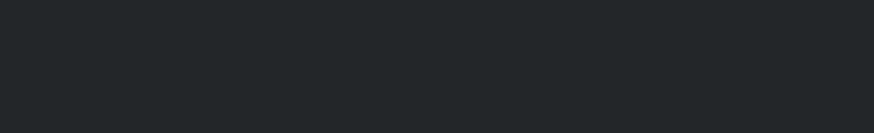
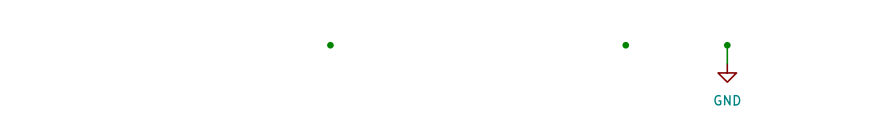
junction: none -> (330, 45)
junction: none -> (625, 45)
wire: none -> (727, 45) (727, 63)
junction: none -> (727, 45)
power symbol: none -> GND (727, 72)

